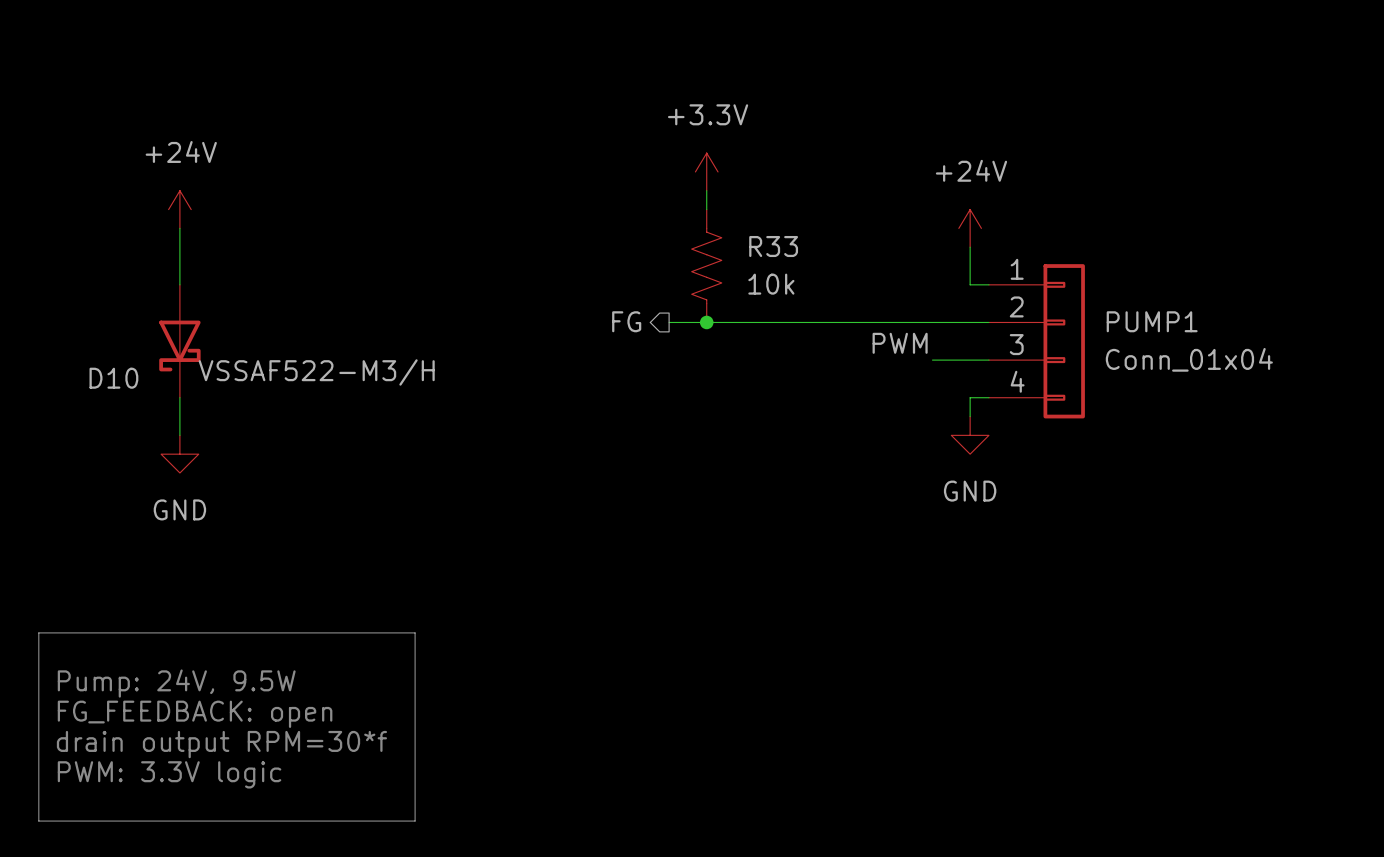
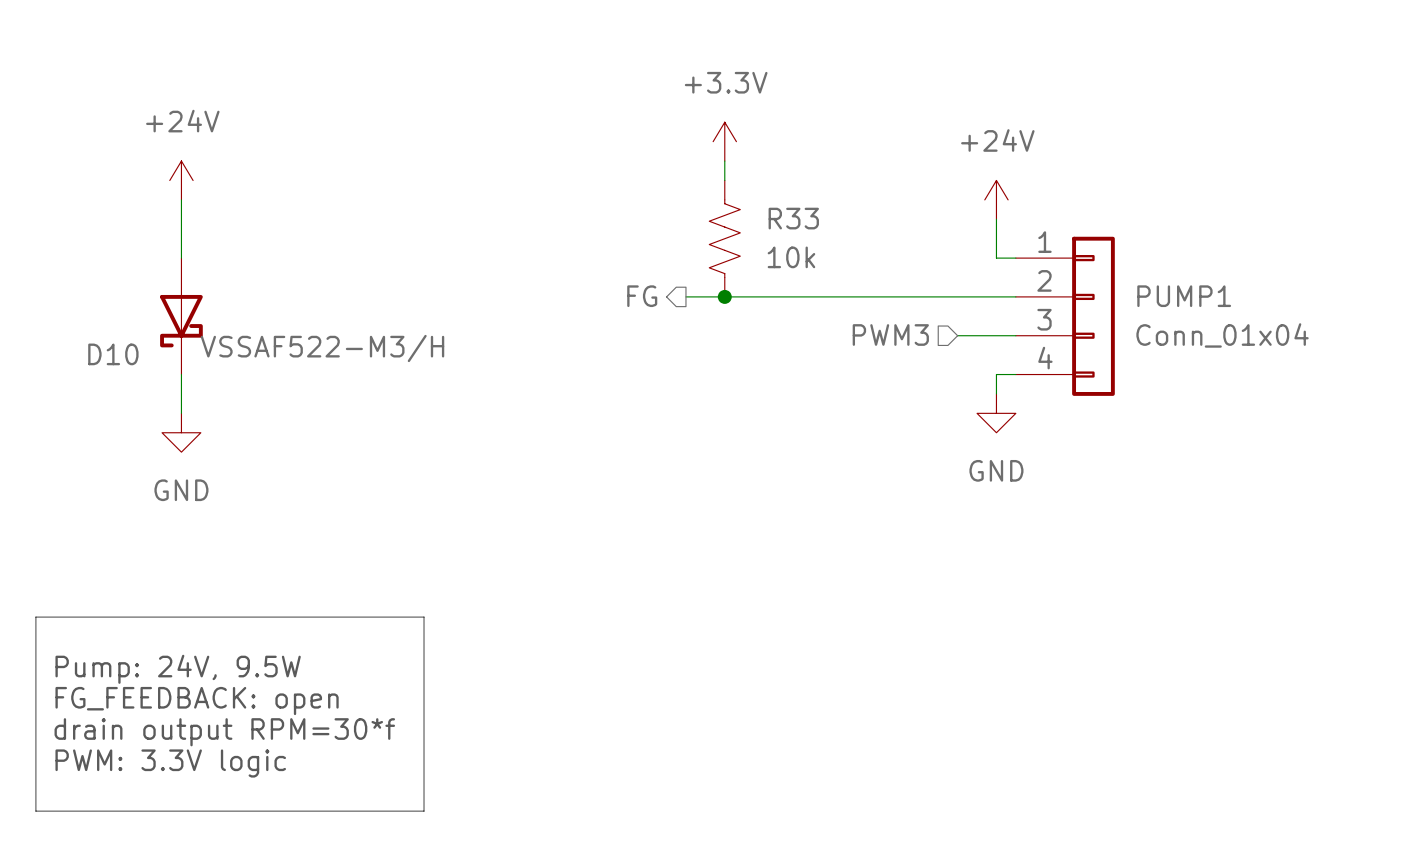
label: PWM (900, 343) -> none
hierarchical label: none -> PWM3 (890, 335)

